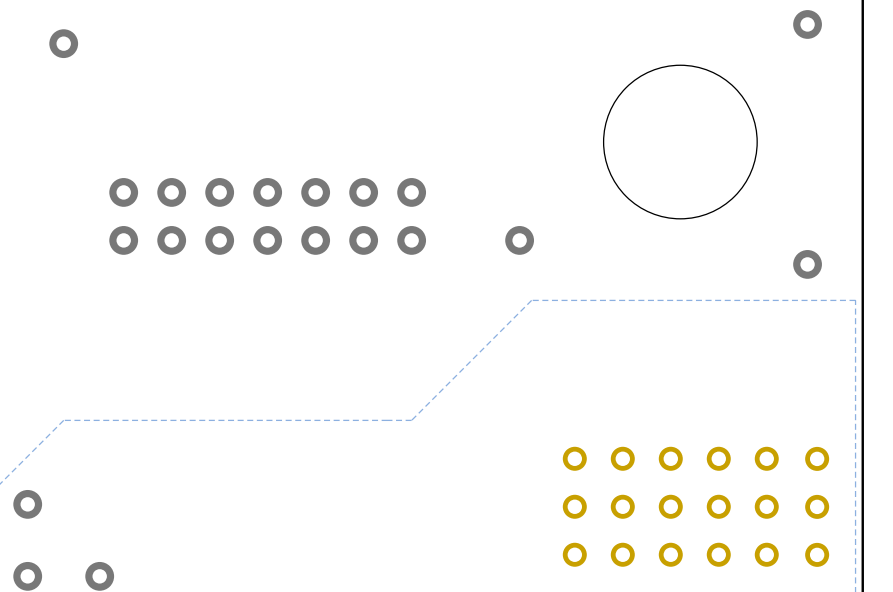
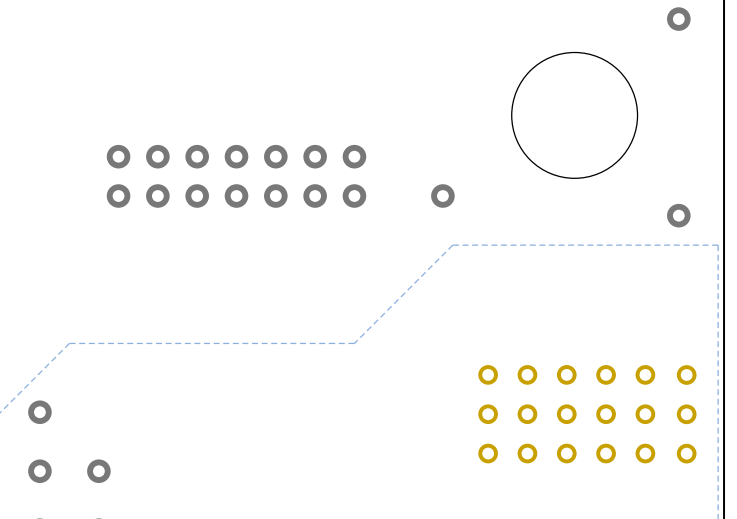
via: (63, 43) -> none

